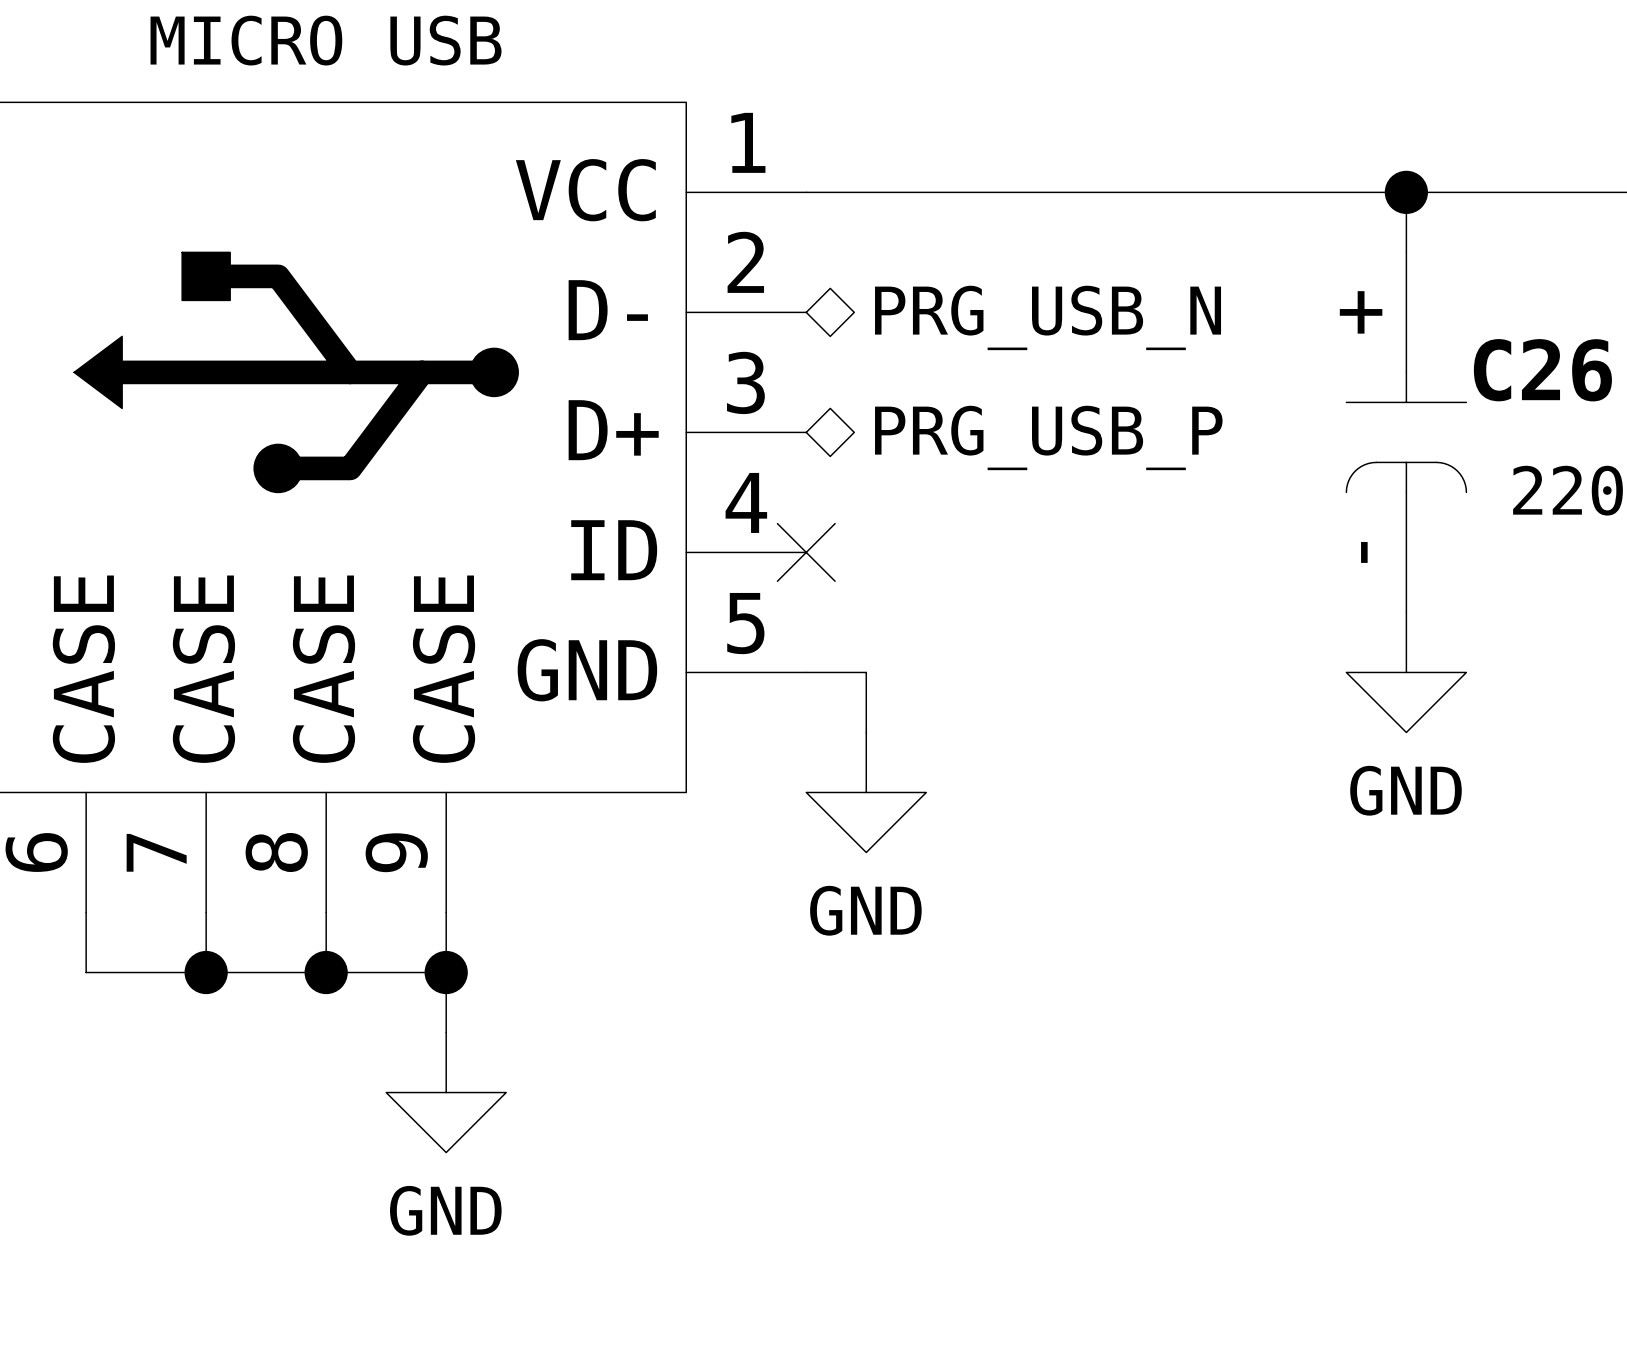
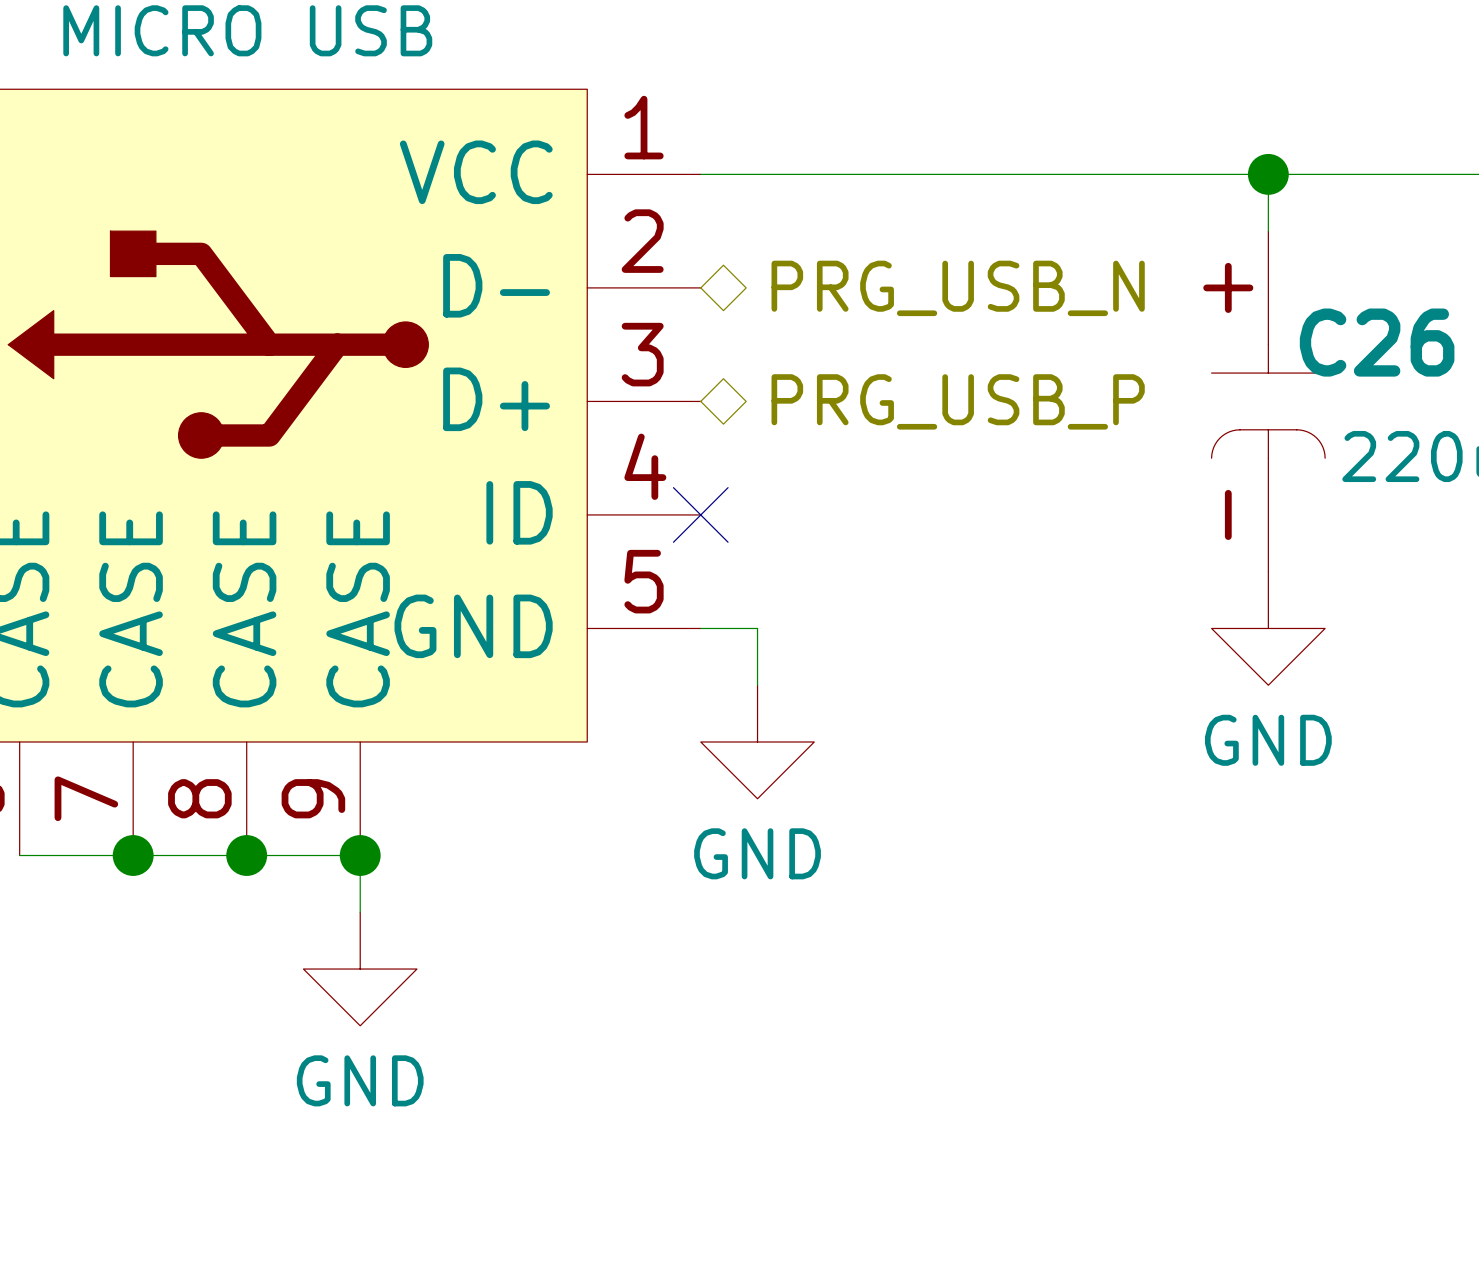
wire: (86, 912) (86, 972) (446, 972) (446, 1032) -> (19, 855) (360, 855)
wire: (206, 912) (206, 972) -> none
wire: (326, 912) (326, 972) -> none
junction position: (206, 972) -> (133, 855)
junction position: (326, 972) -> (246, 855)
junction position: (446, 972) -> (360, 855)
power symbol position: GND (446, 1092) -> GND (360, 969)

